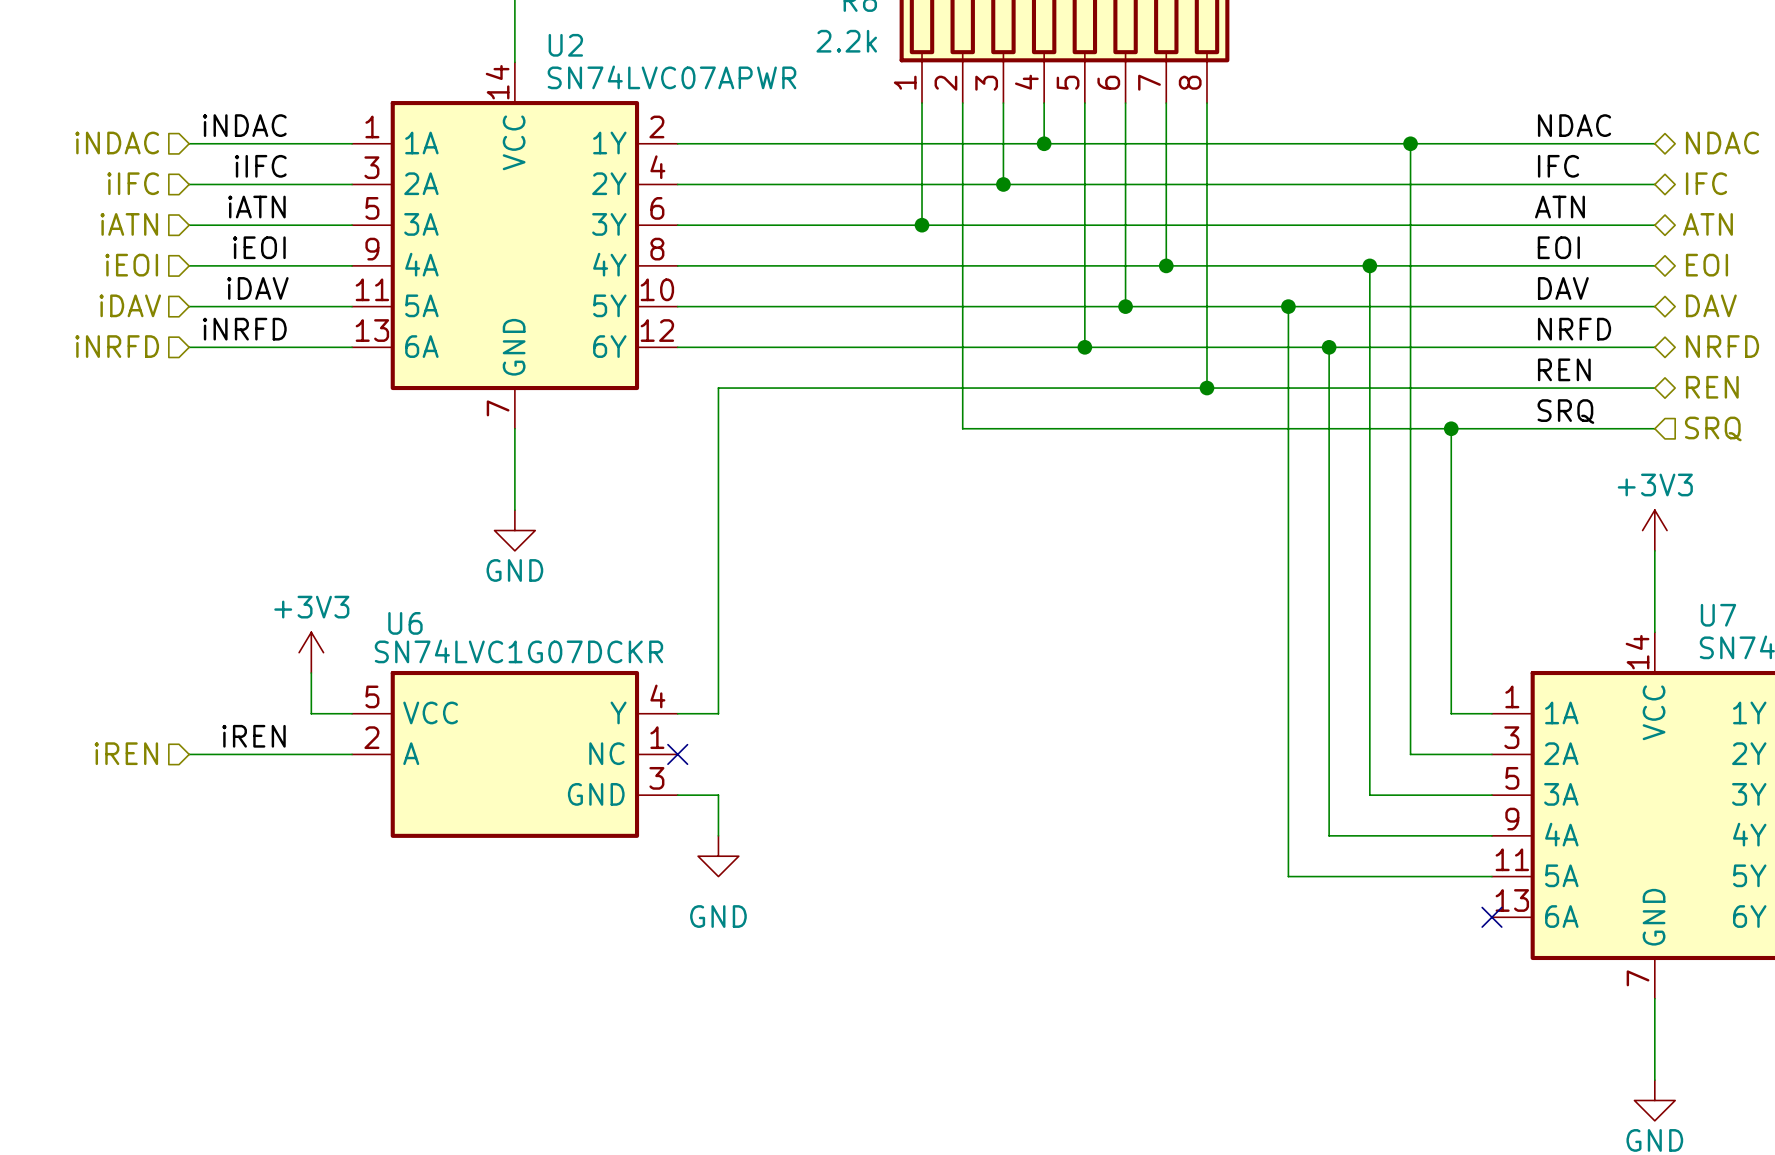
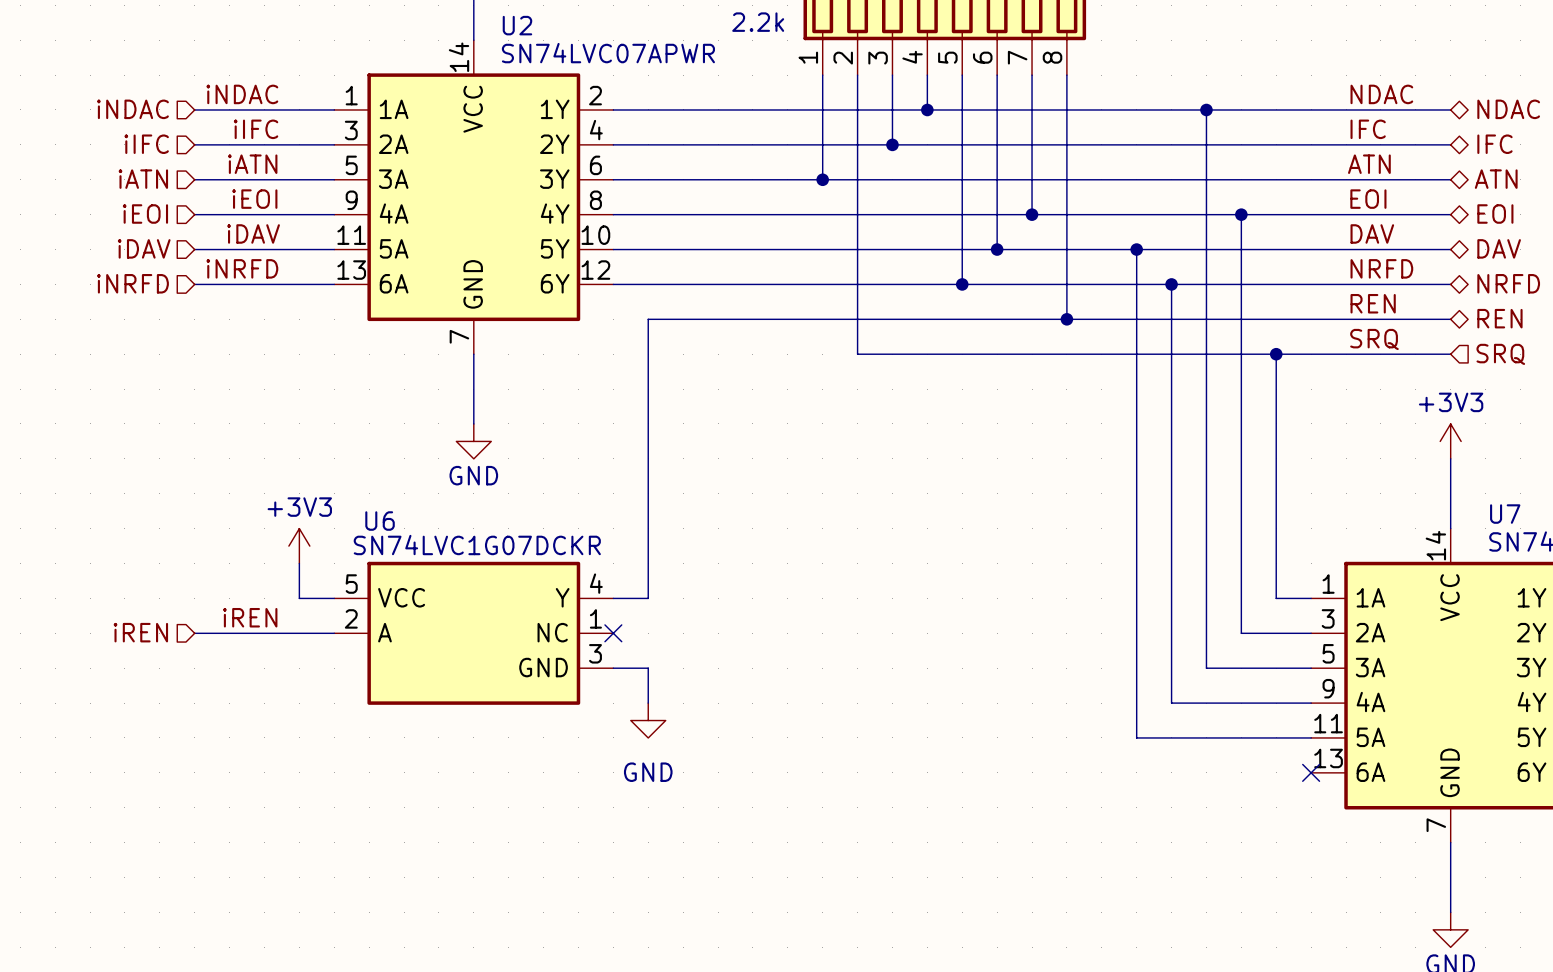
wire: (1410, 143) (1410, 265) -> (1206, 109) (1206, 214)
junction position: (1410, 143) -> (1206, 109)
junction position: (1369, 265) -> (1241, 214)

